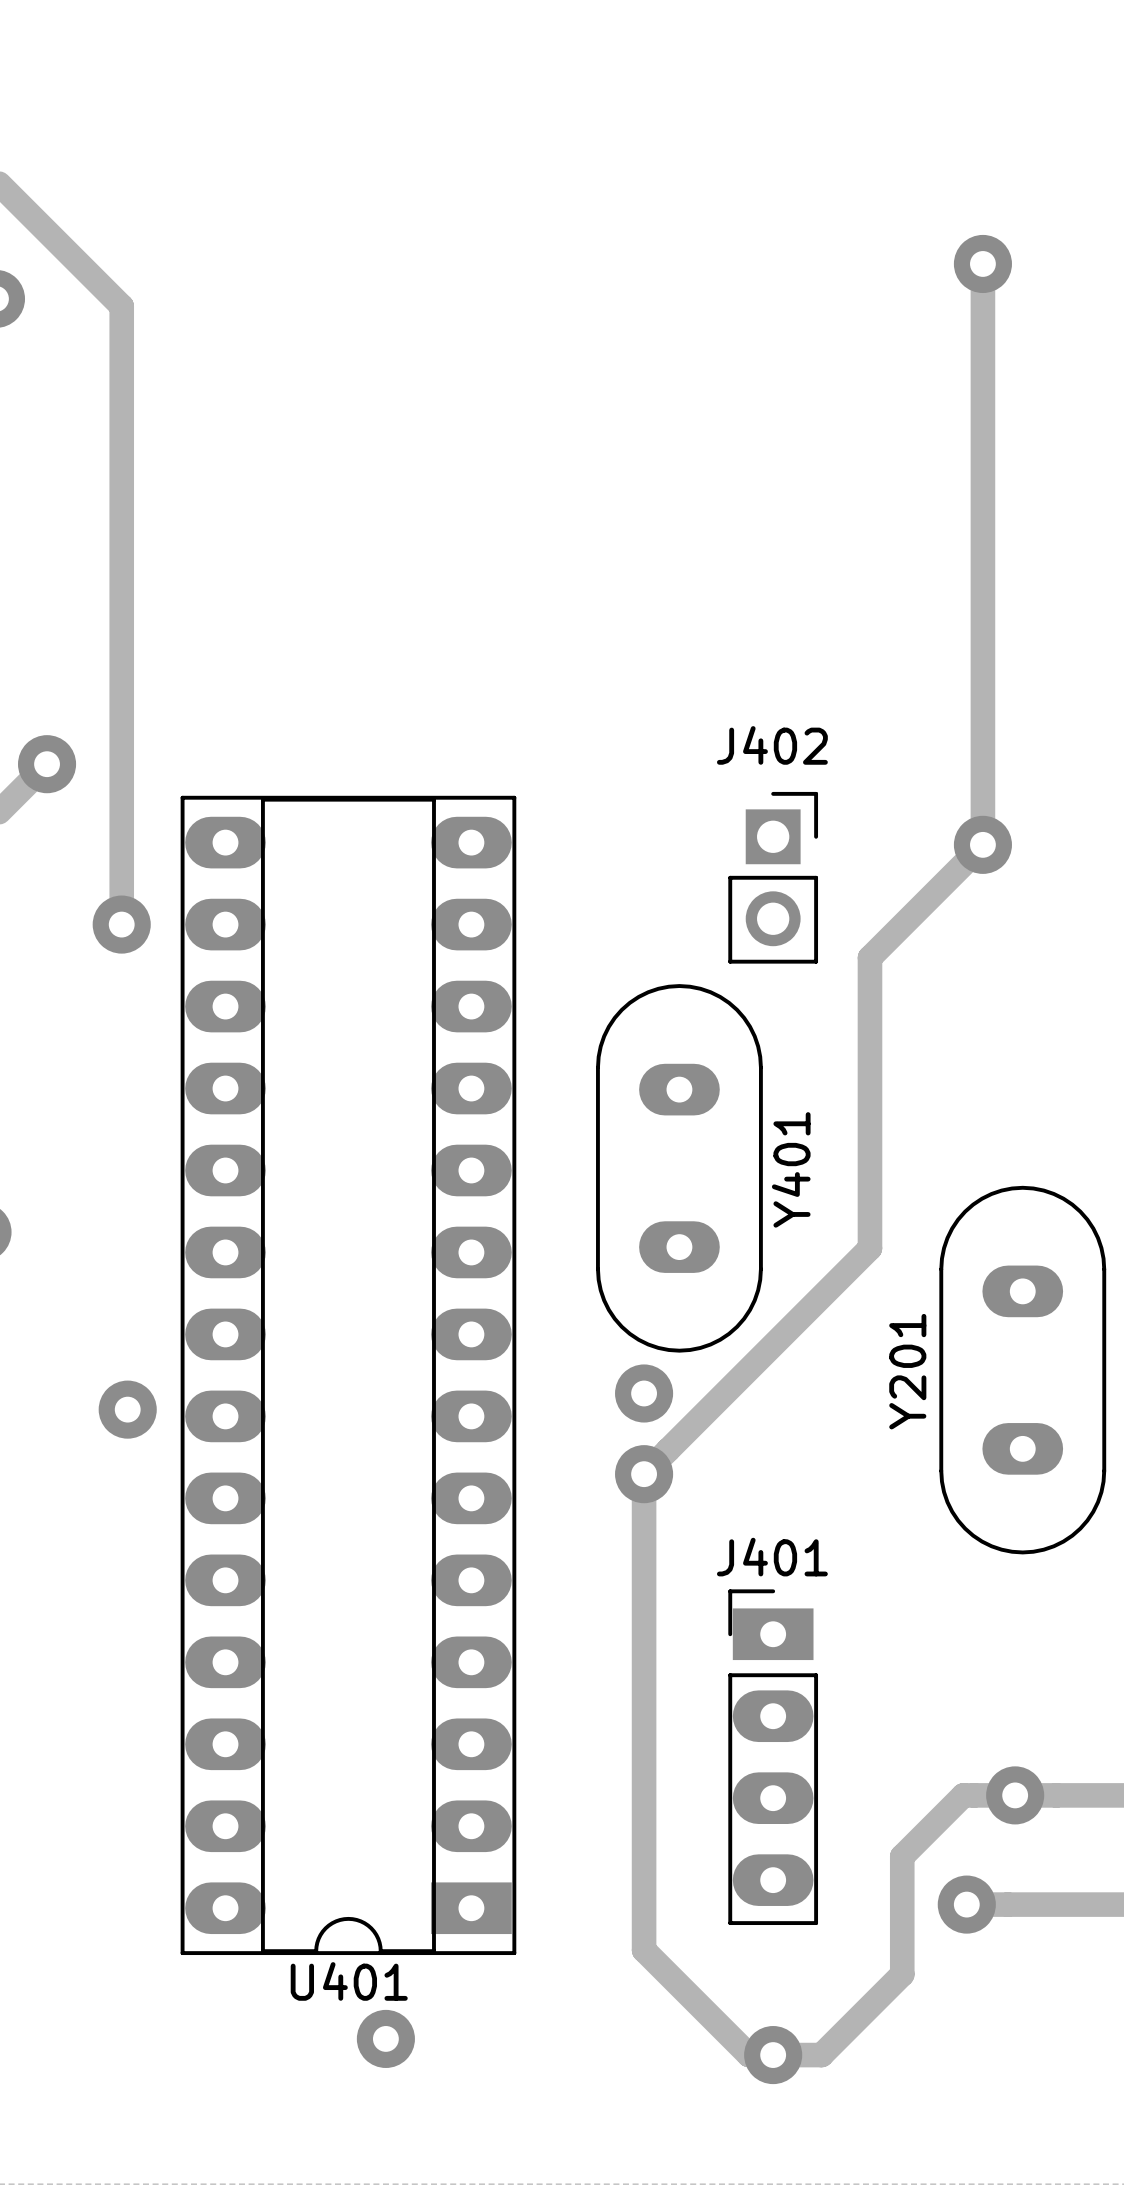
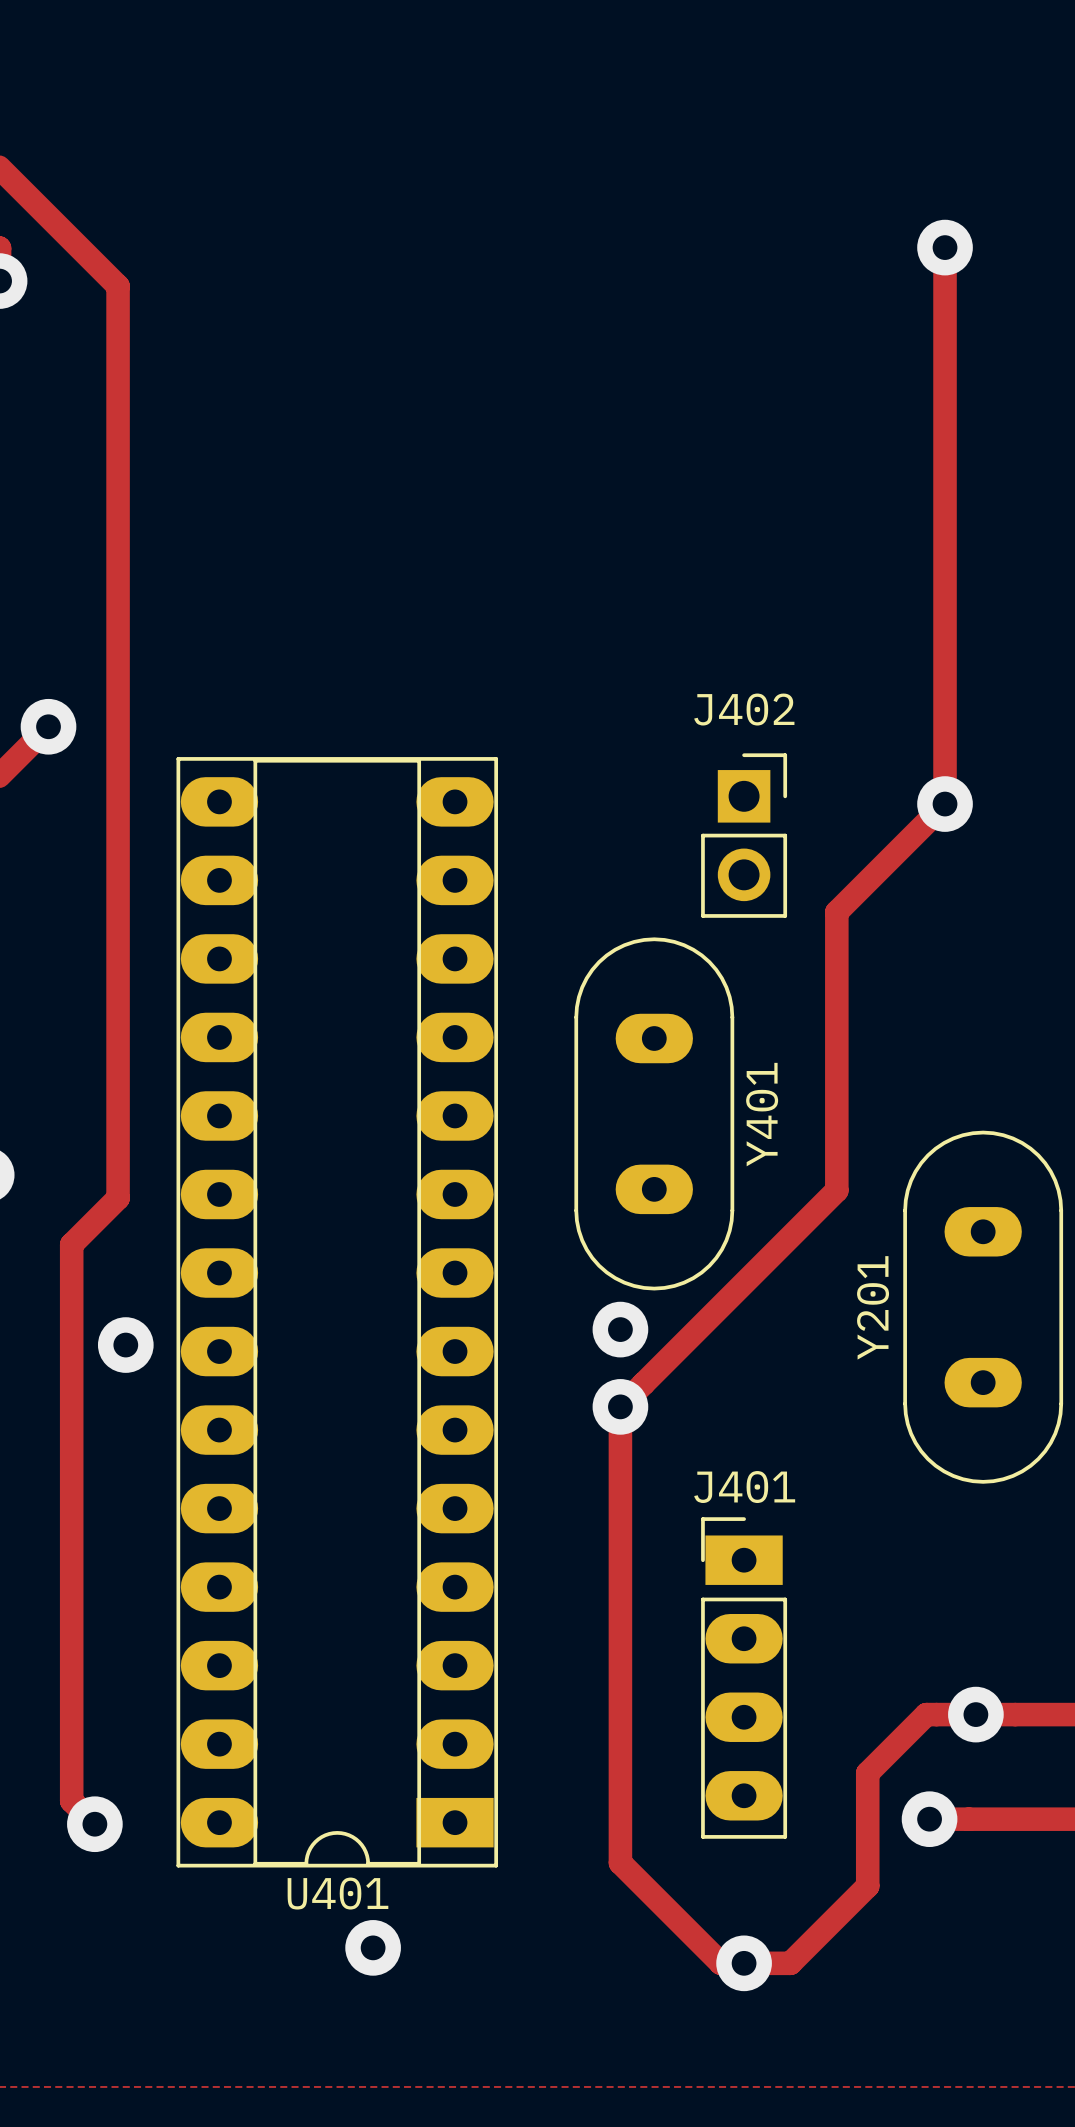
track: (119, 304) (121, 306) (121, 924) -> (118, 286) (118, 1198) (71, 1244) (71, 1801) (94, 1824)
via: (121, 924) -> none
via: none -> (94, 1824)

